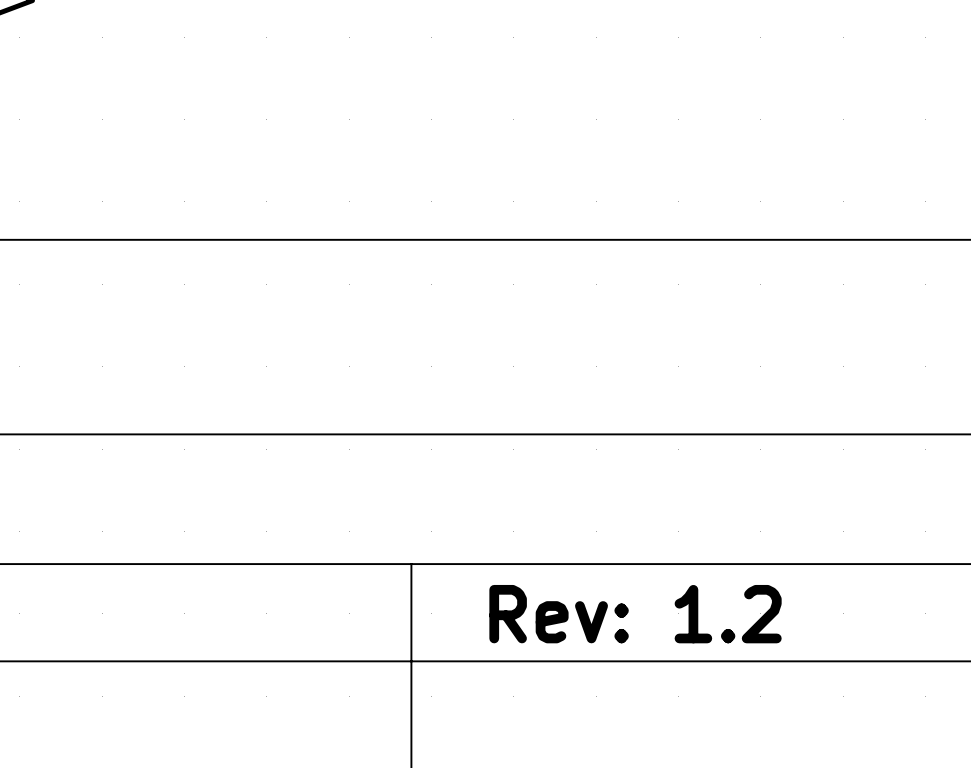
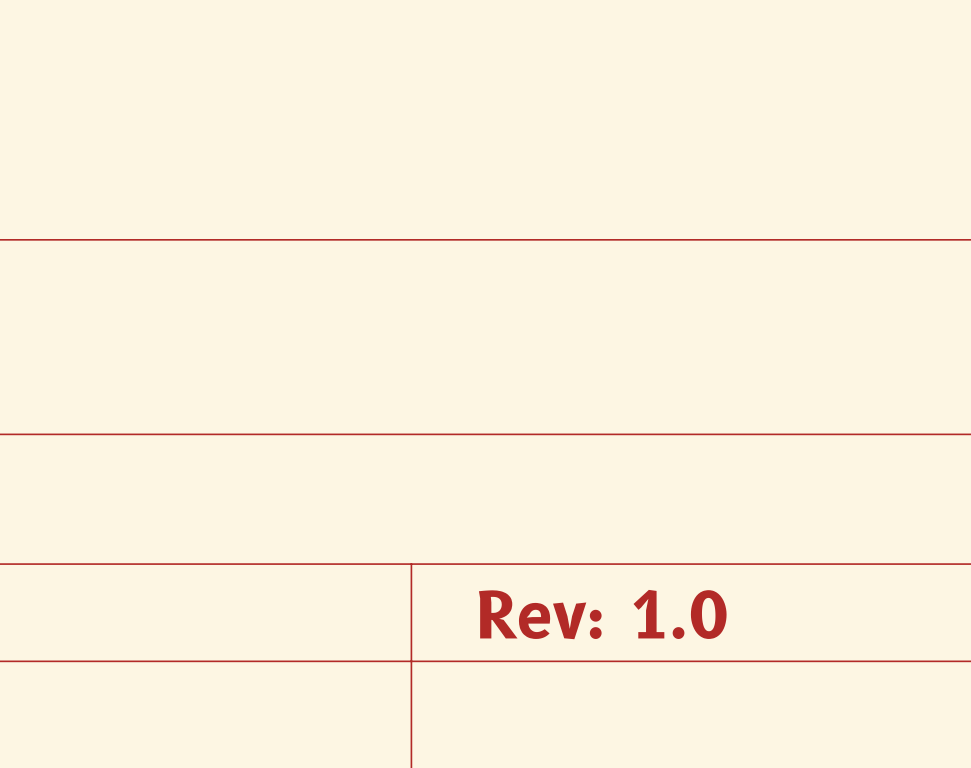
title block: Rev: 1.2 (635, 614) -> Rev: 1.0 (602, 614)

